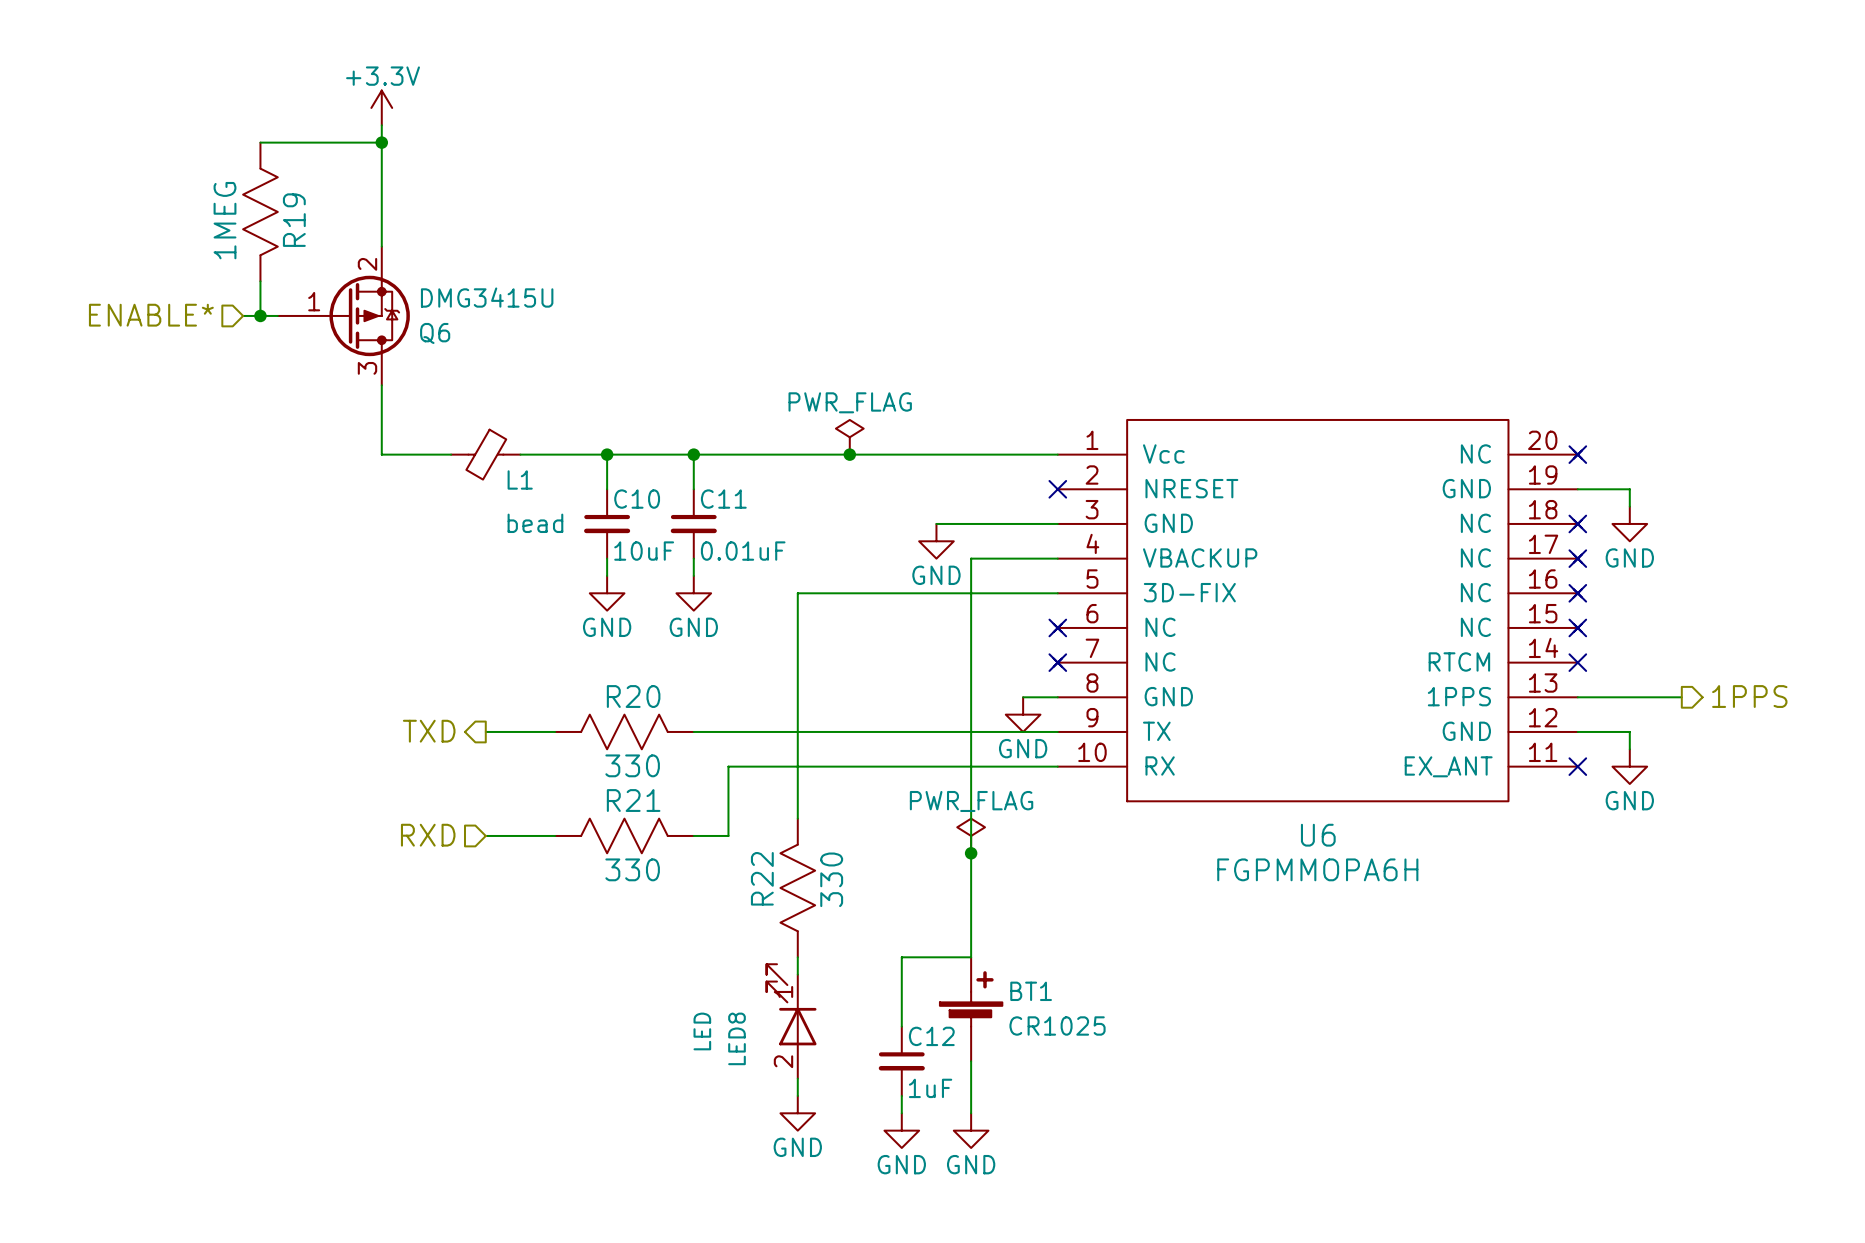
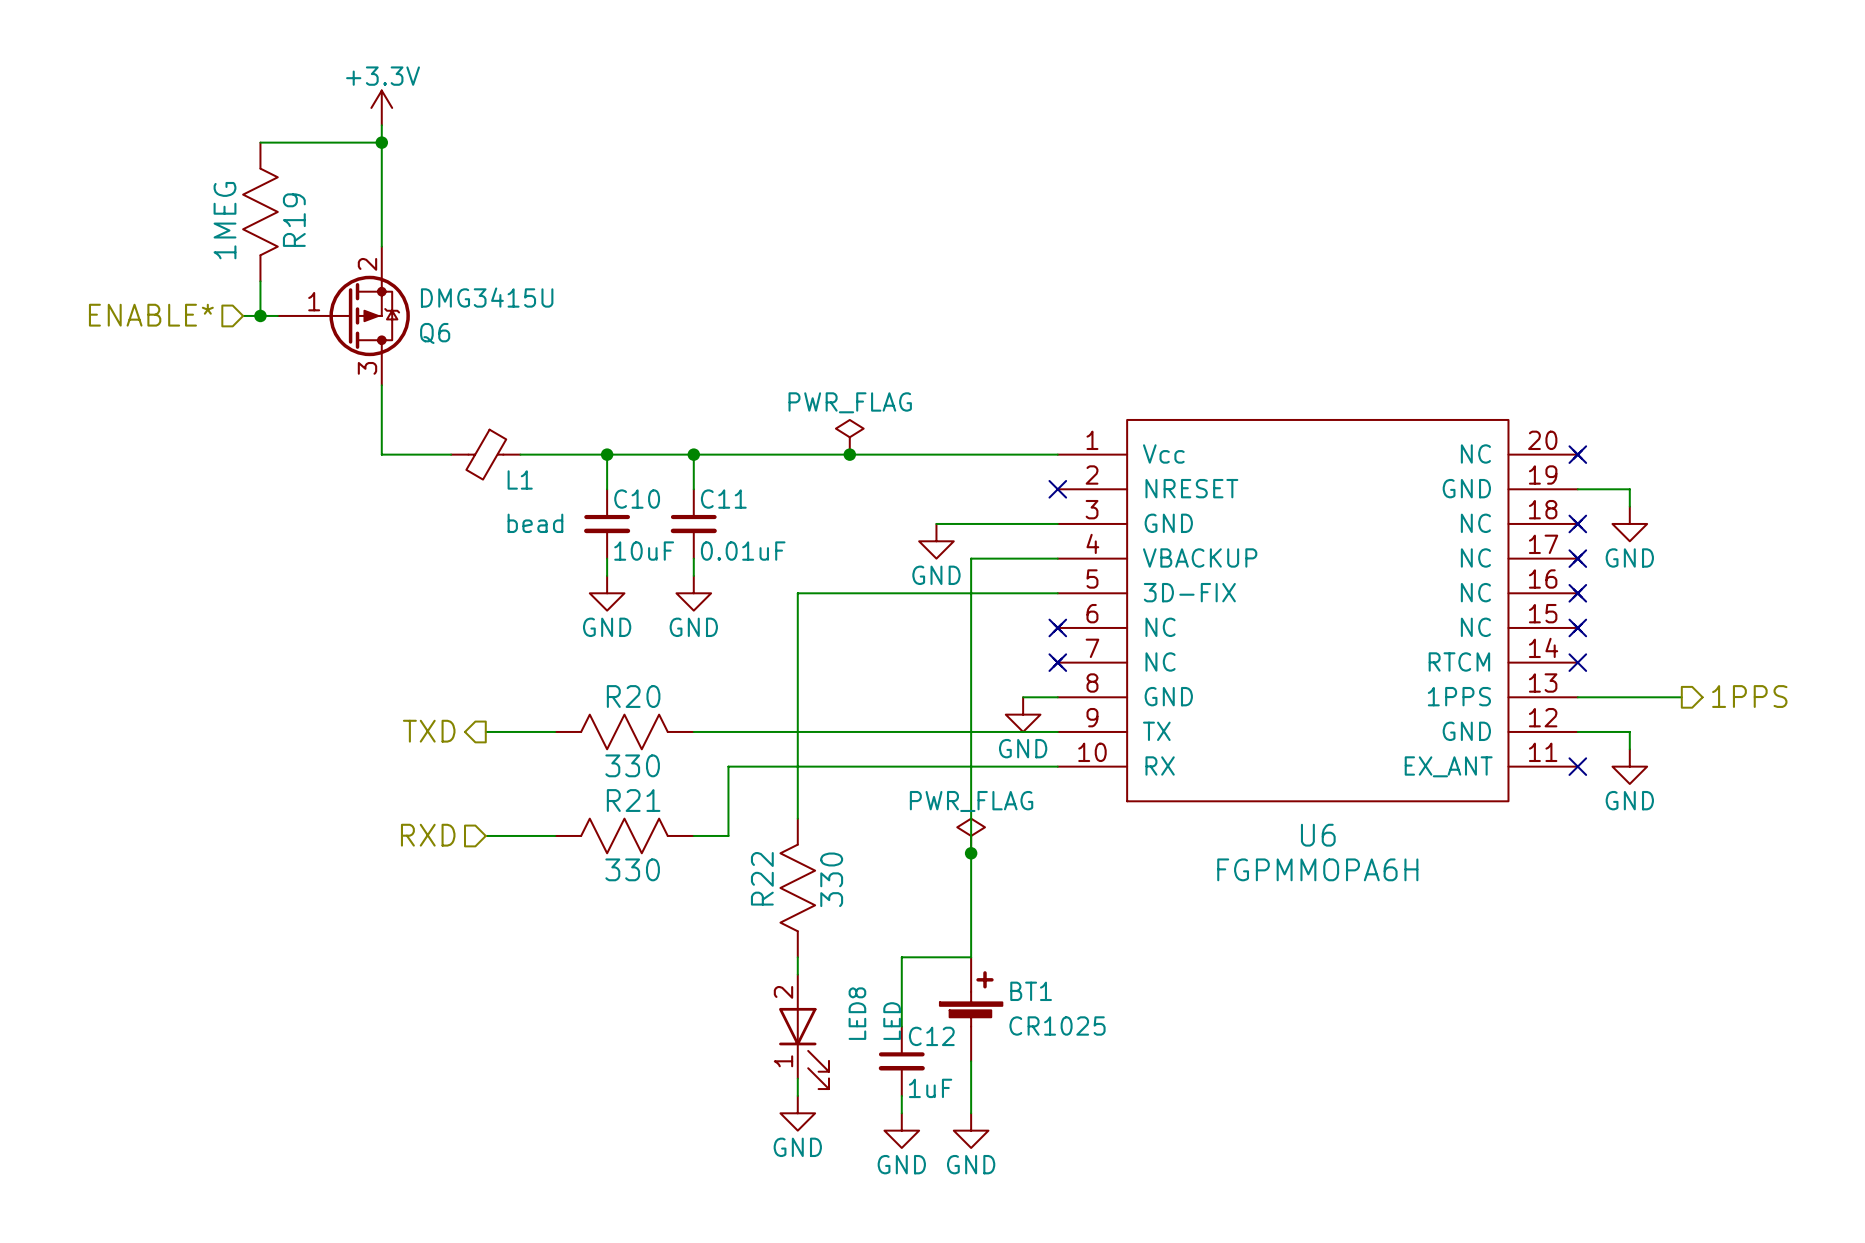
LED8 rotation: 0° (791, 1004) -> 180° (804, 1048)

